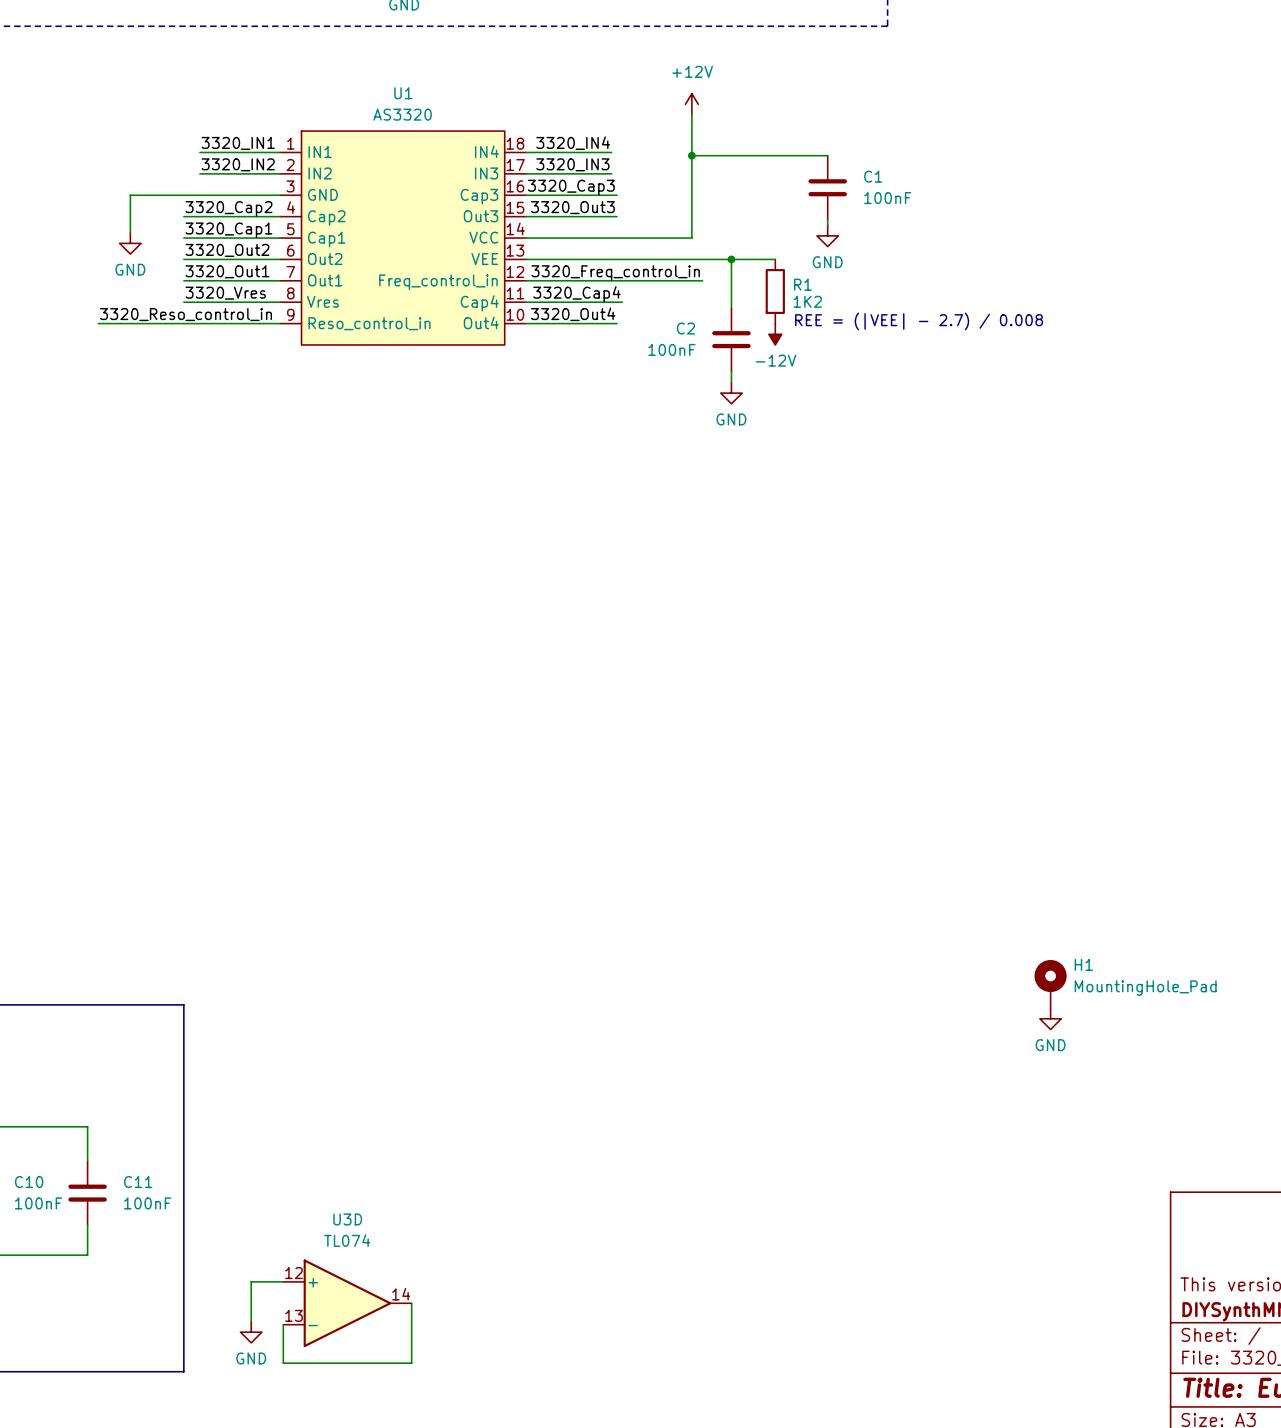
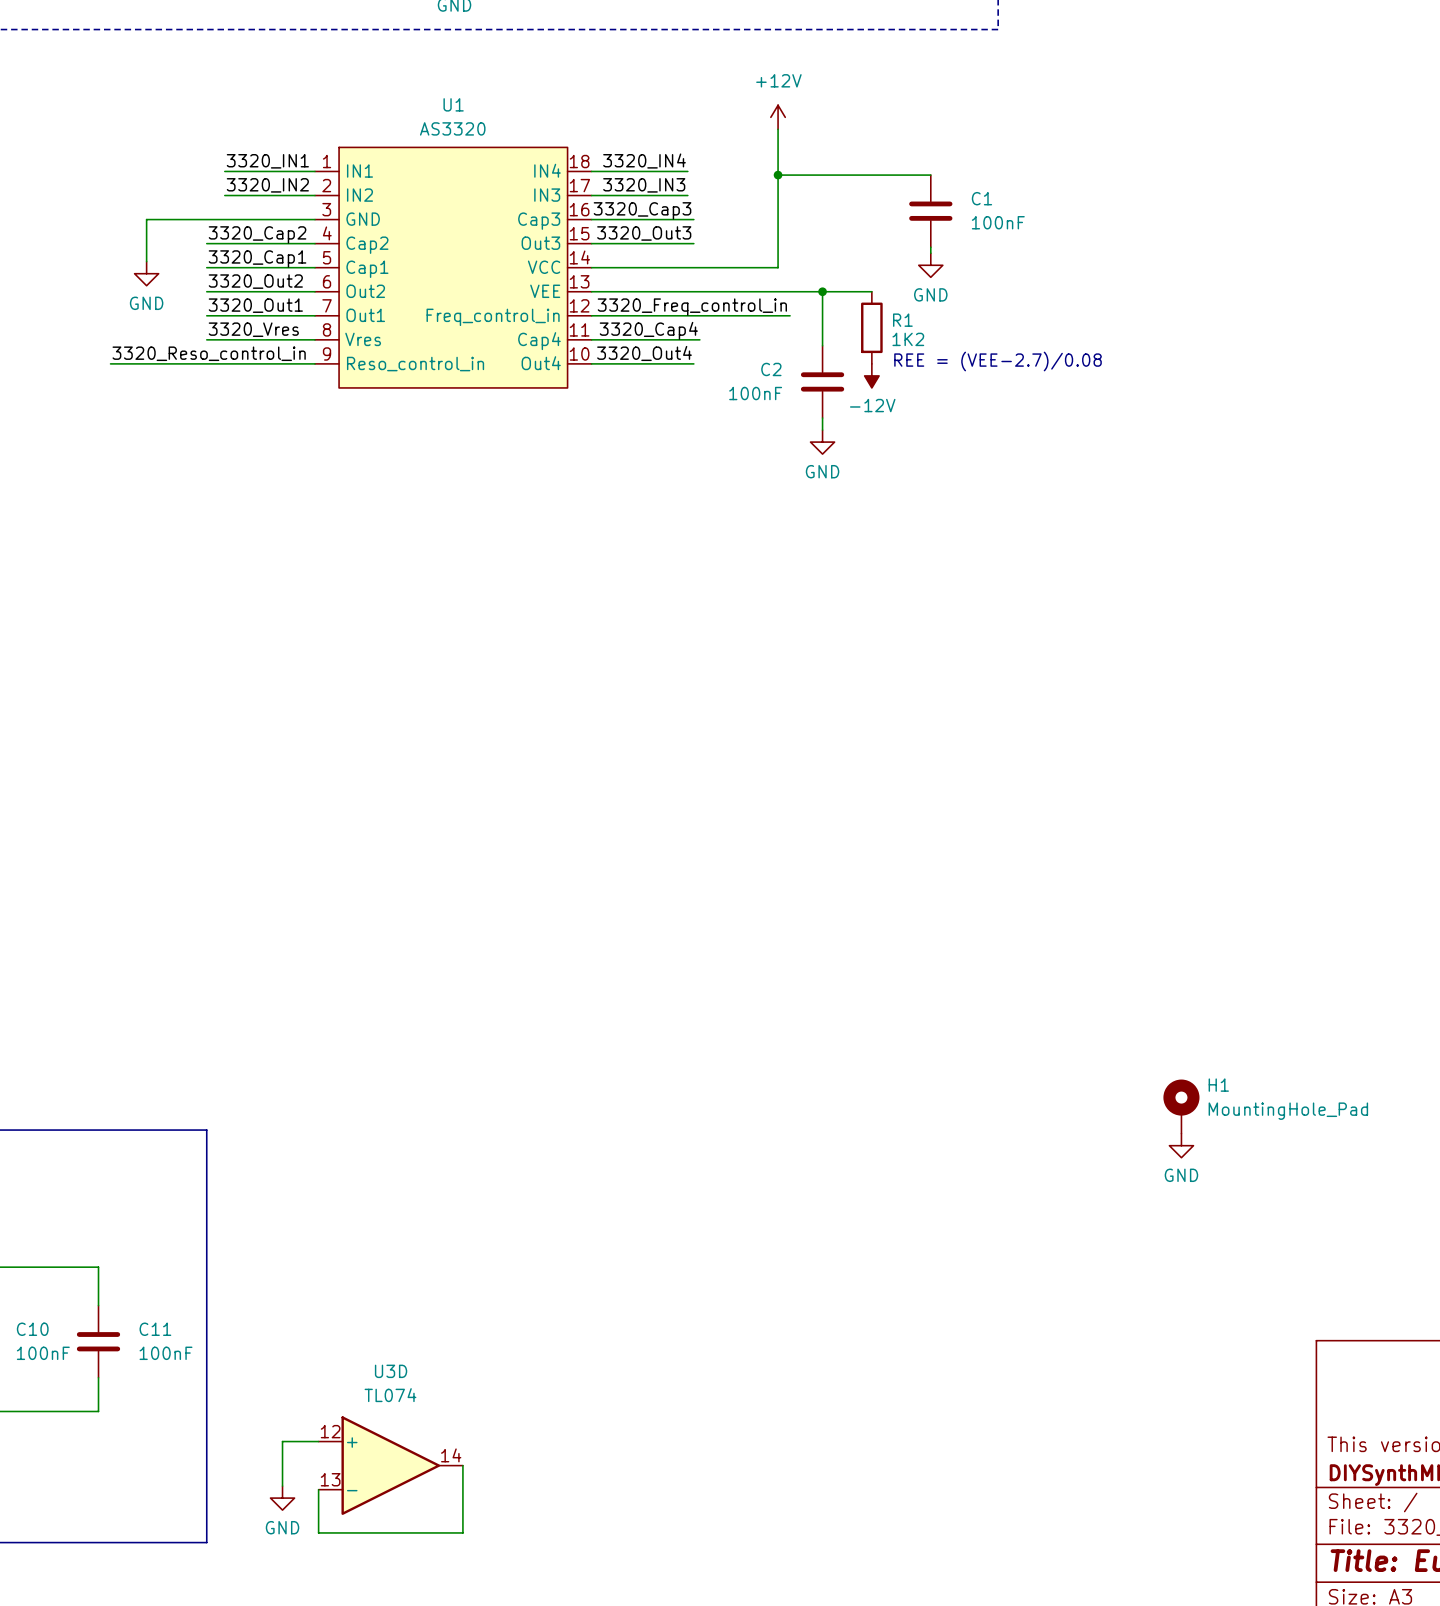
text: REE = (|VEE| - 2.7) / 0.008 (919, 321) -> REE = (VEE-2.7)/0.08 (998, 361)

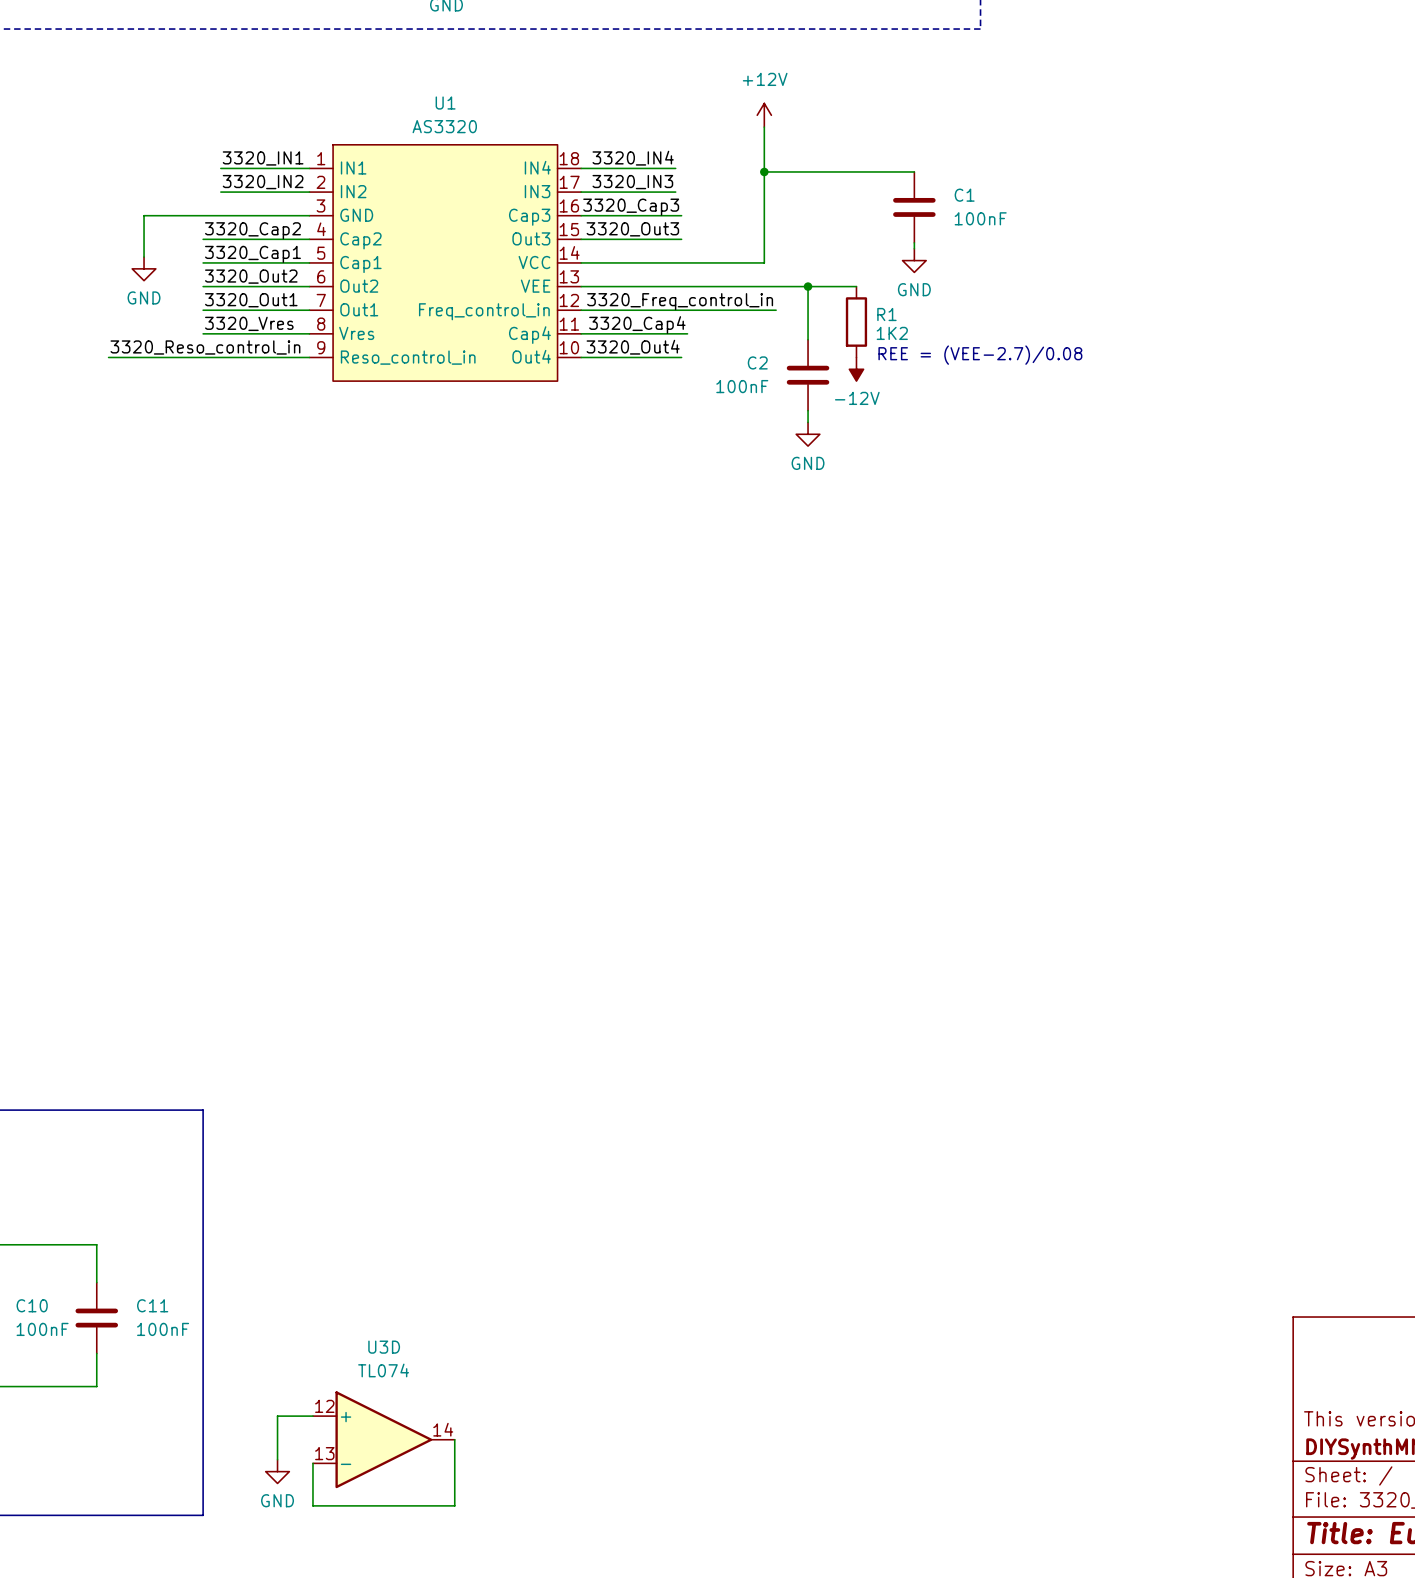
H1: MountingHole_Pad (1181, 1106) -> none
power symbol: GND (1181, 1145) -> none

